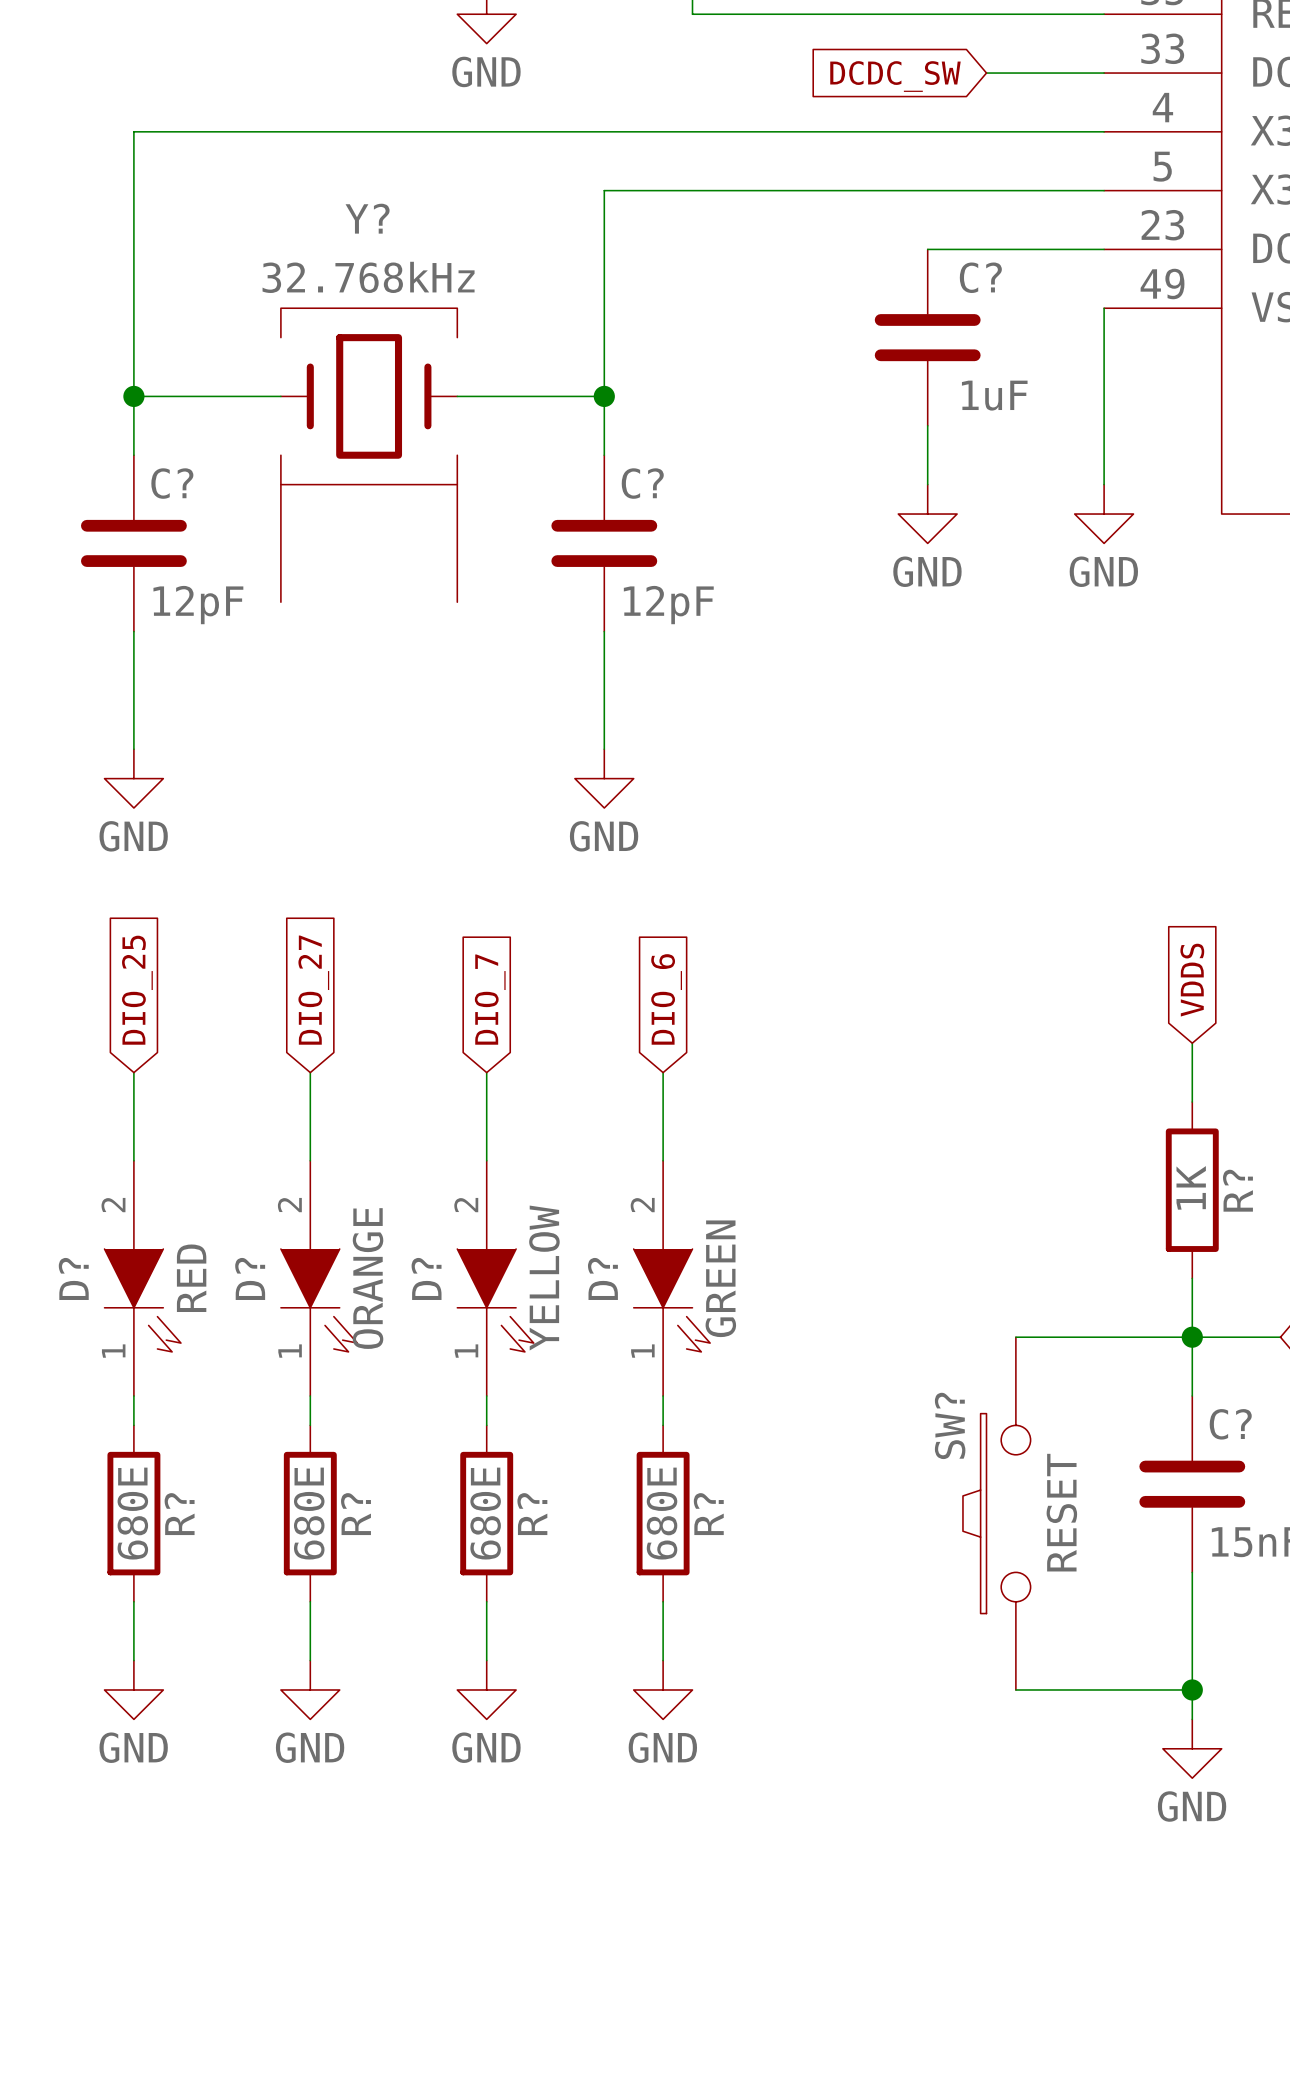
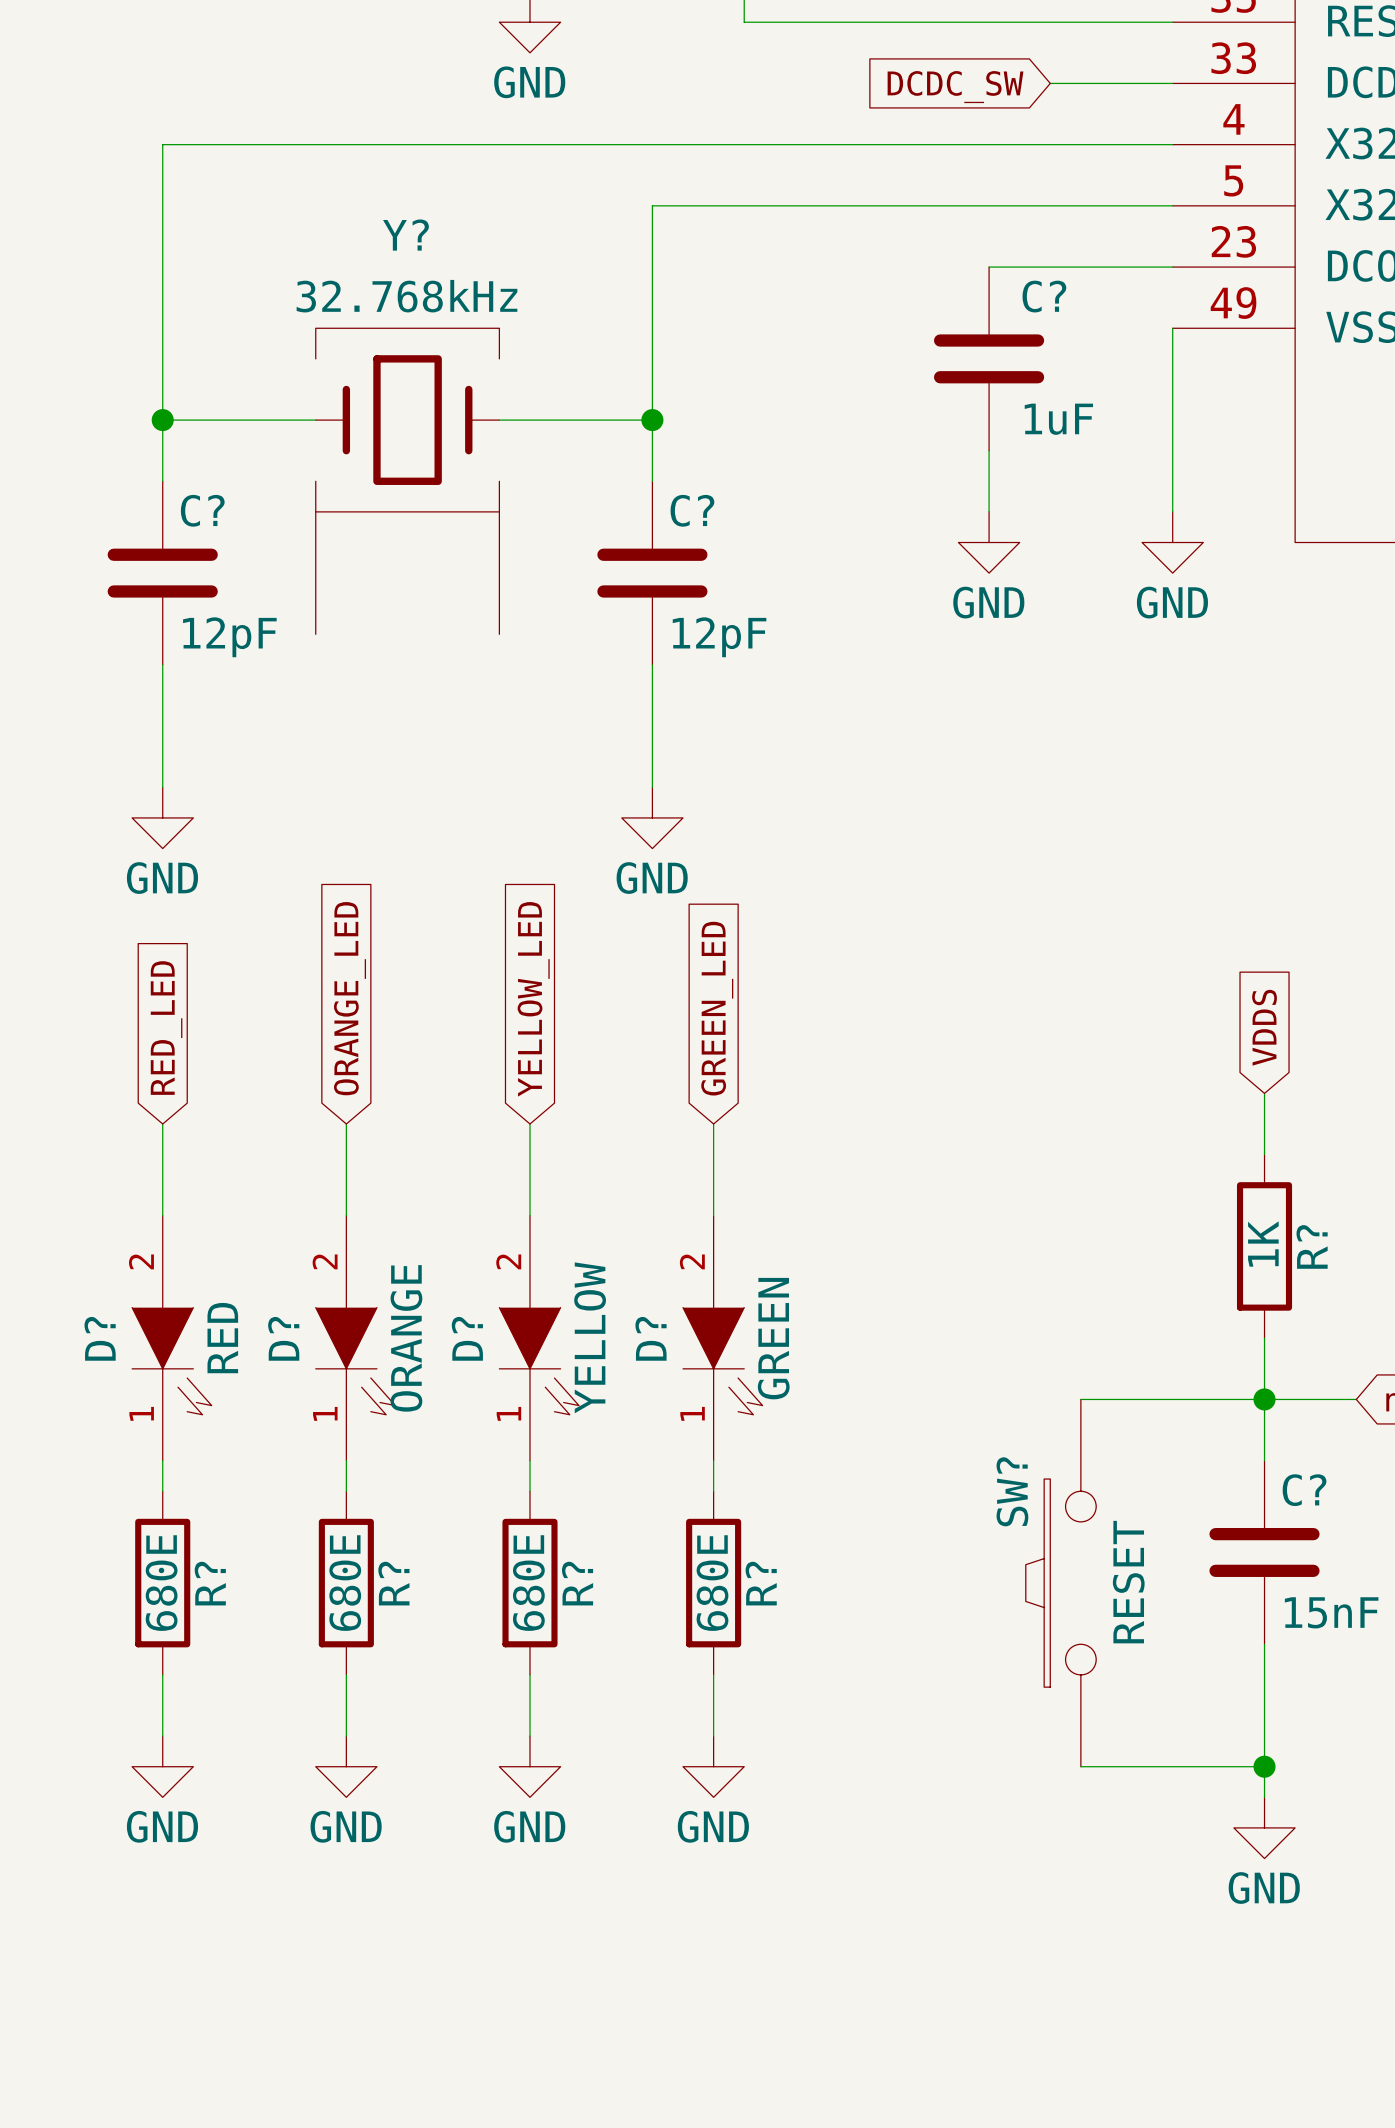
global label: DIO_25 (137, 990) -> RED_LED (166, 1028)
global label: DIO_27 (313, 990) -> ORANGE_LED (350, 998)
global label: DIO_7 (490, 999) -> YELLOW_LED (533, 999)
global label: DIO_6 (666, 999) -> GREEN_LED (717, 1008)

